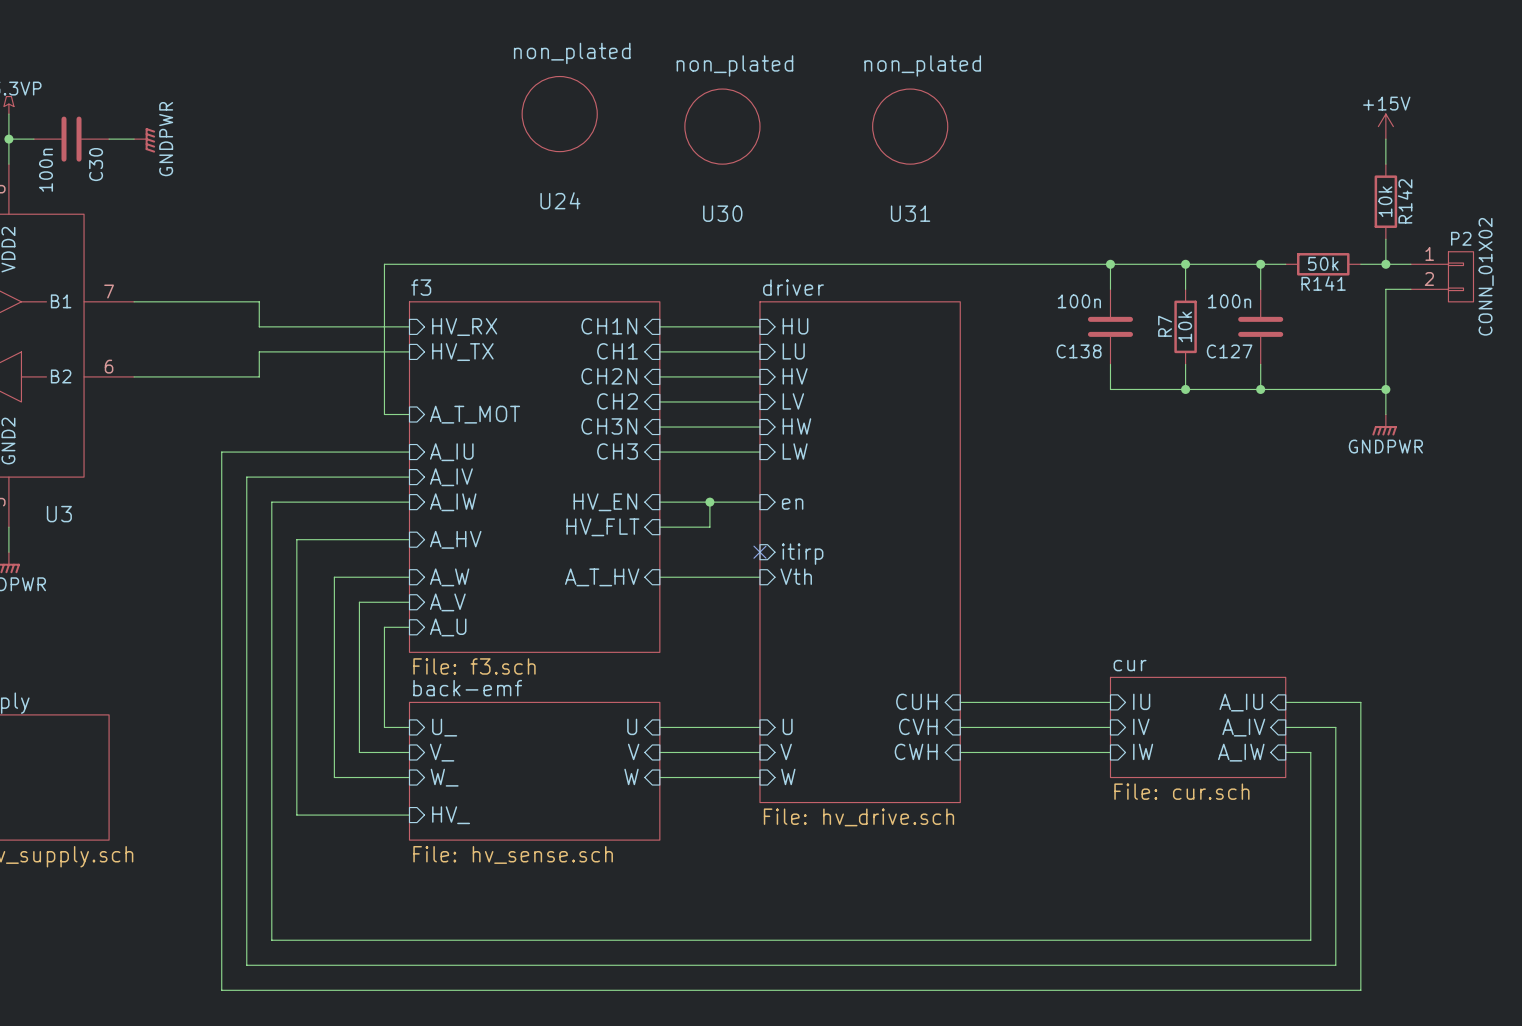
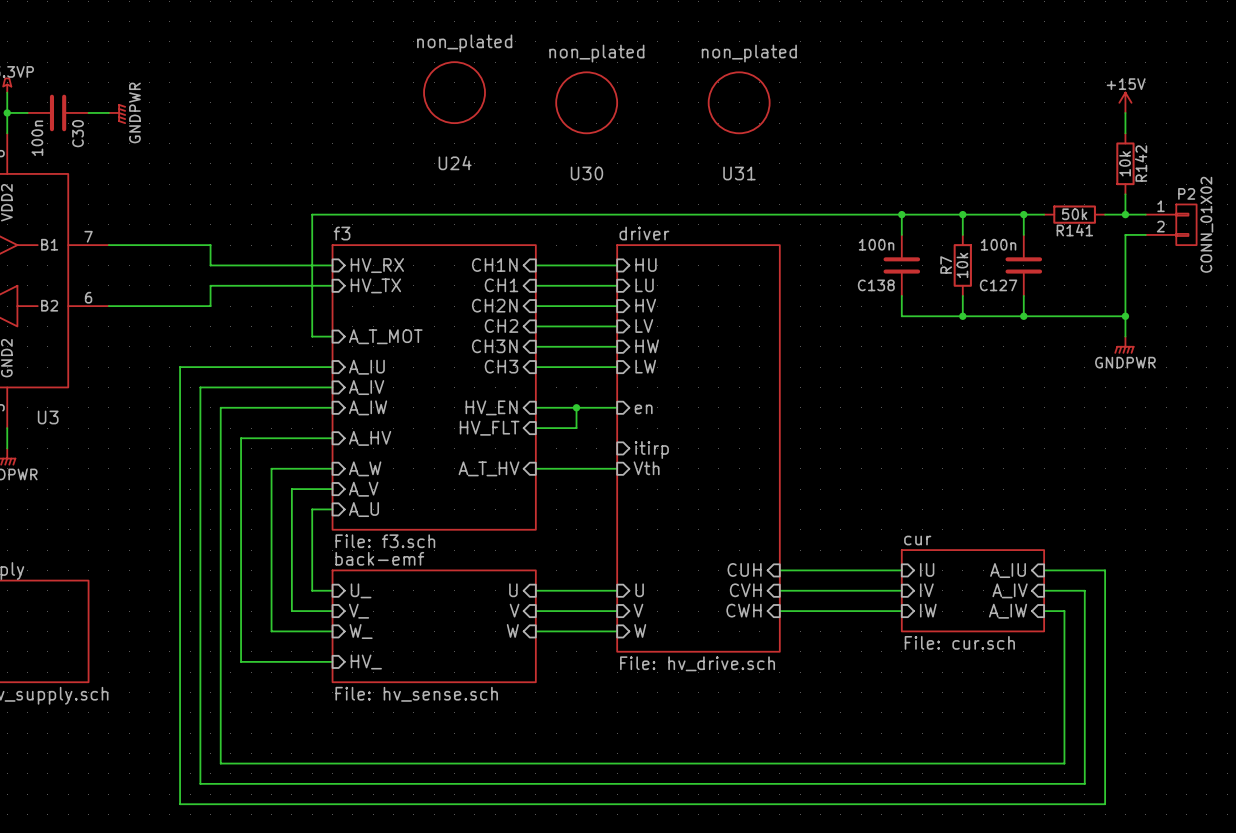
no-connect mark: (759, 552) -> none

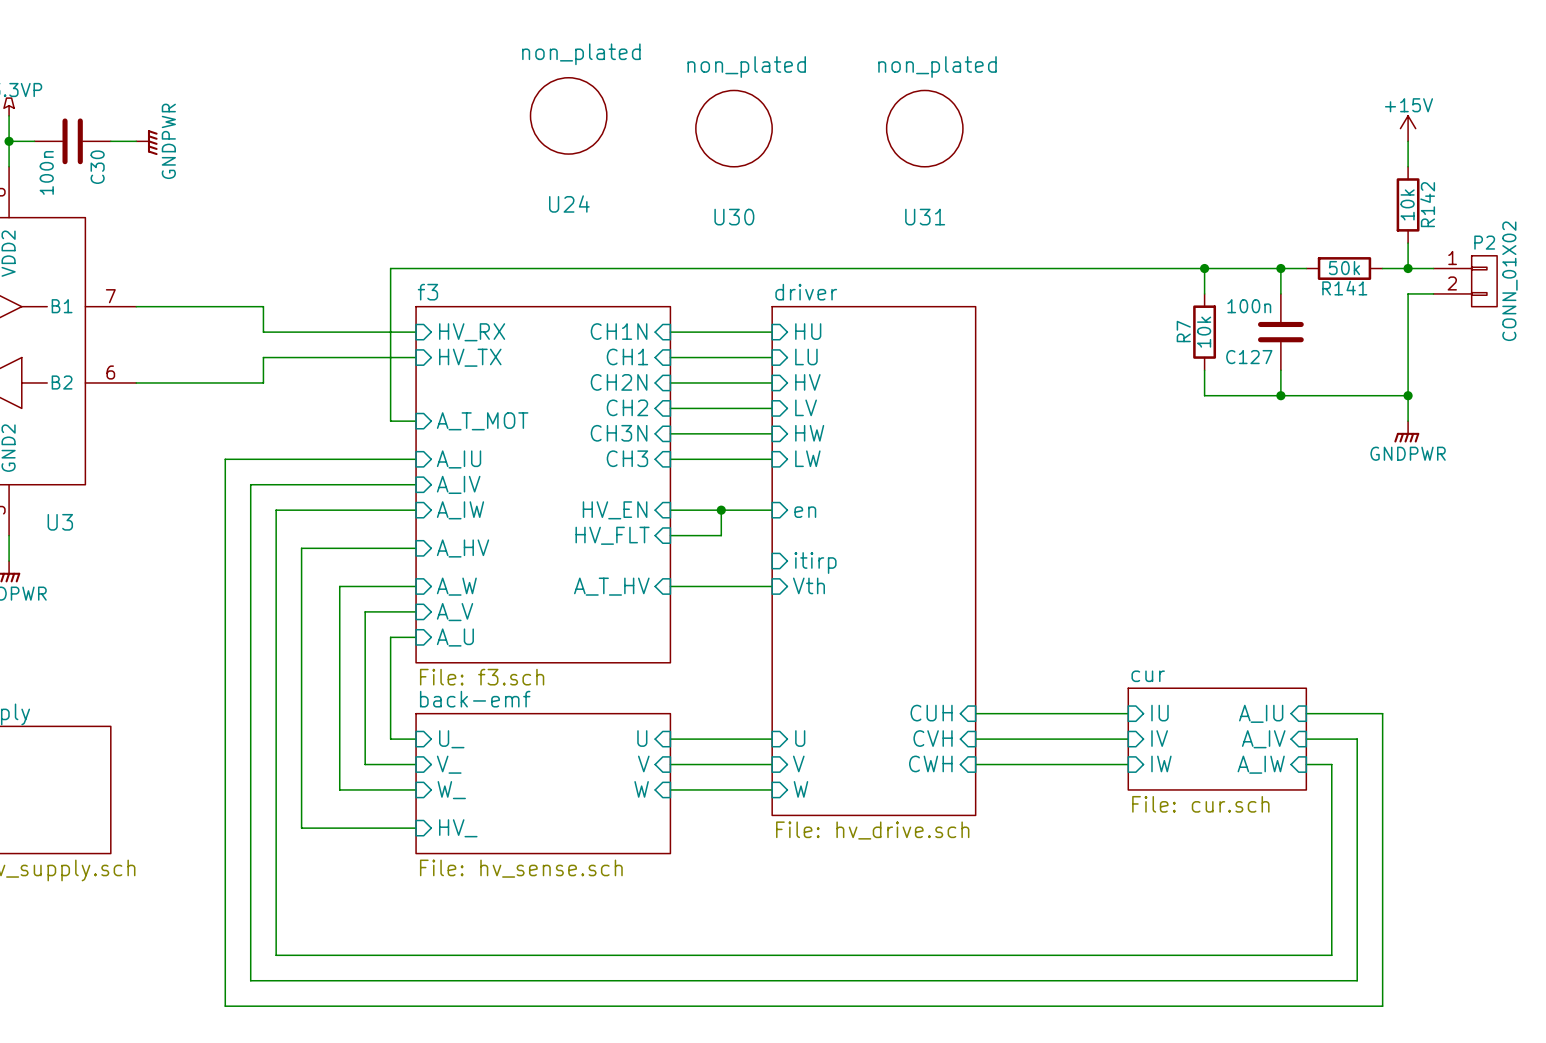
wire: (901, 214) (901, 234) -> none
junction: (901, 214) -> none
C138: 100n (901, 265) -> none
wire: (901, 295) (901, 316) (962, 316) -> none
junction: (962, 316) -> none

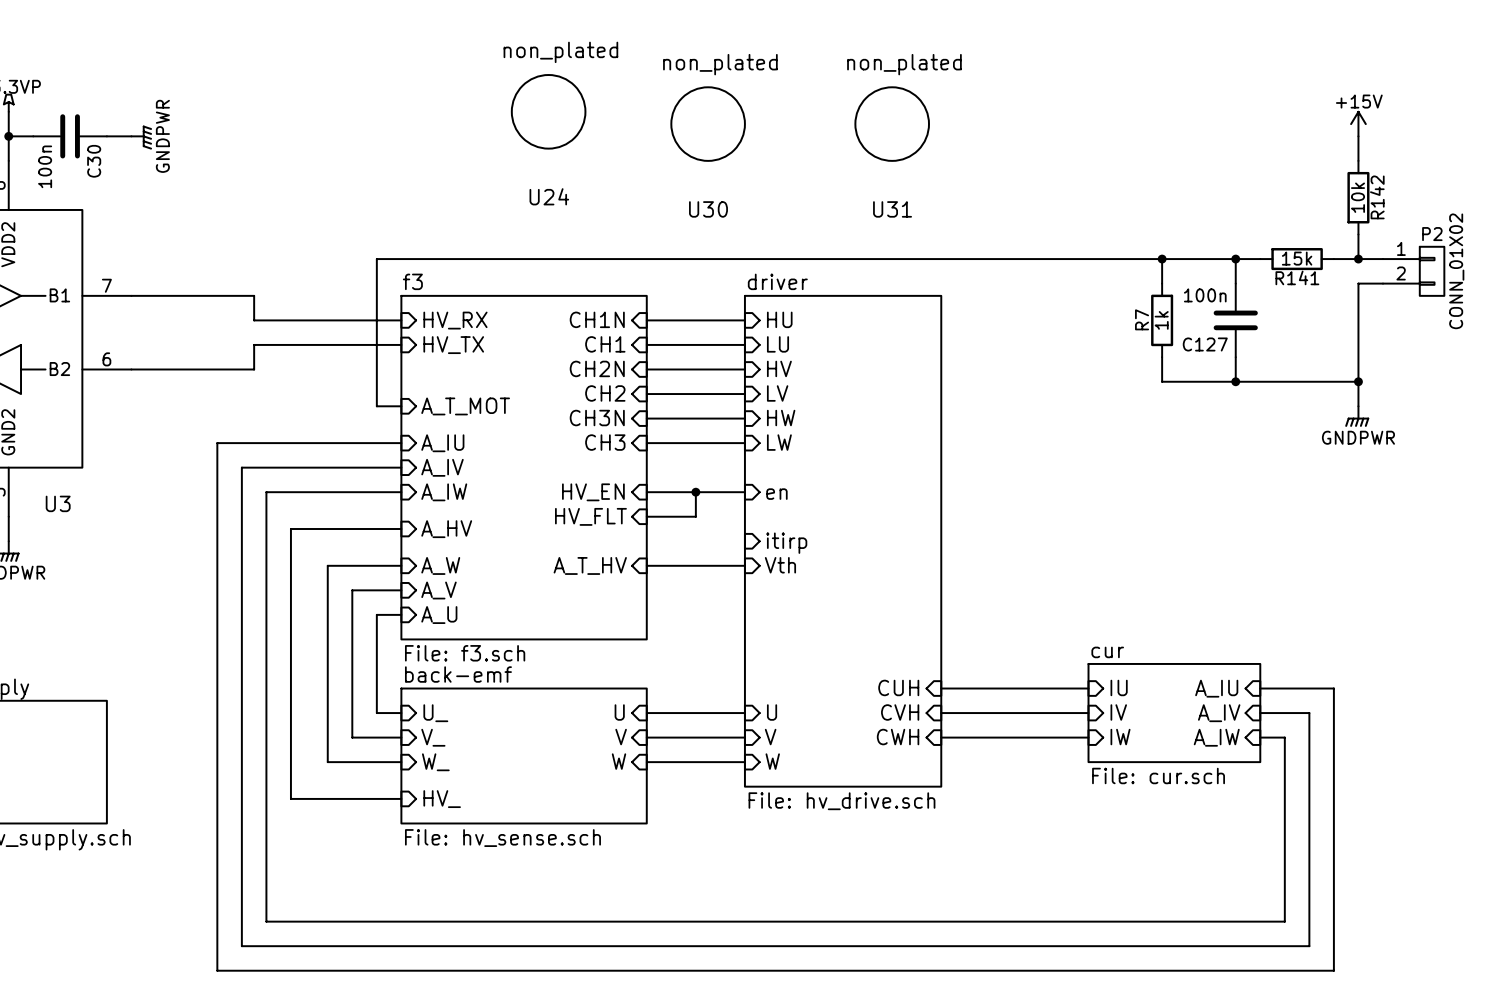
R141 value: 50k (1344, 268) -> 15k (1297, 258)
R7 value: 10k (1204, 332) -> 1k (1161, 320)

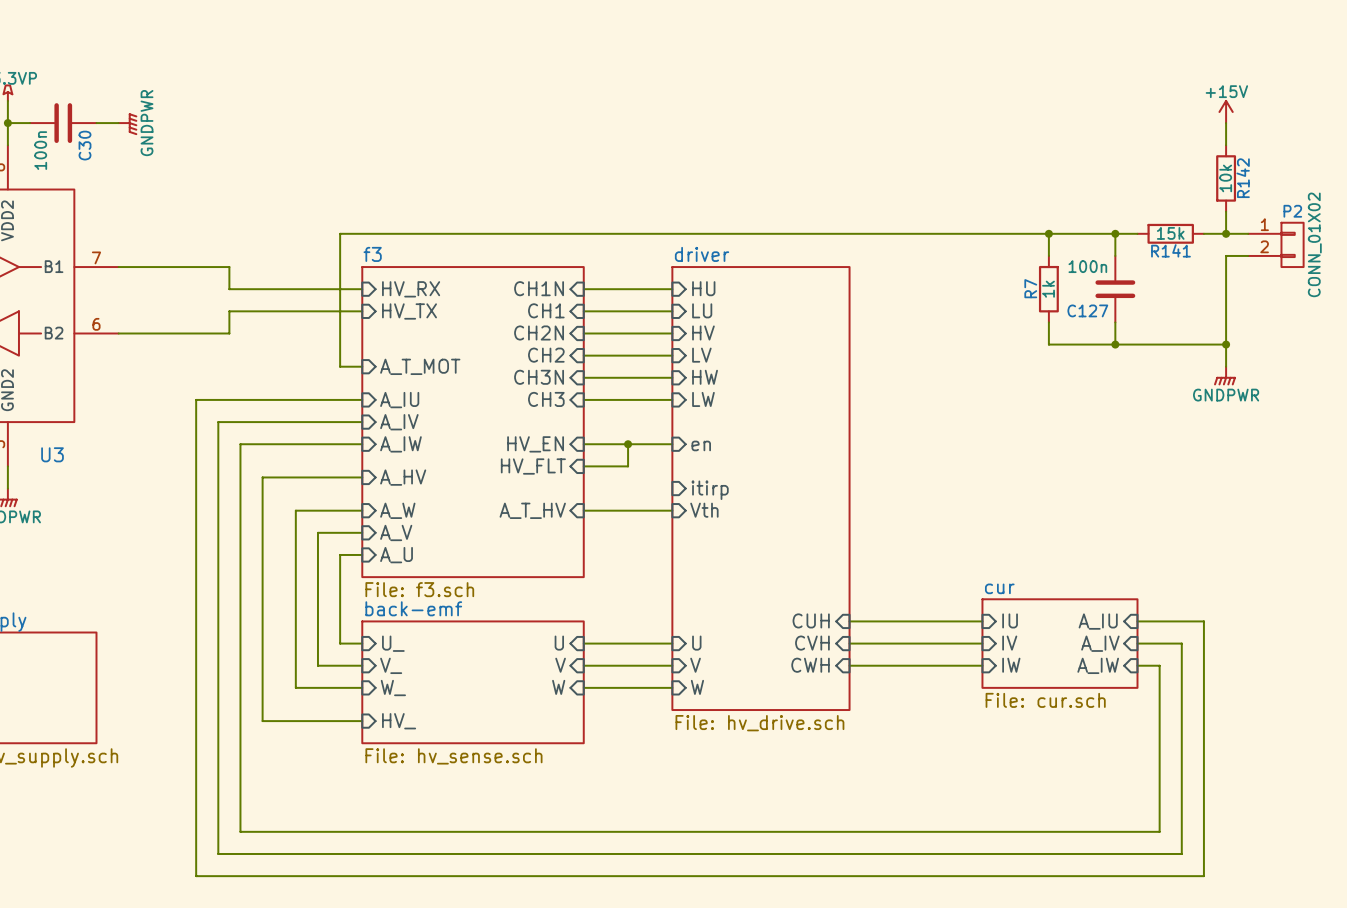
U24: non_plated (548, 111) -> none
U30: non_plated (708, 124) -> none
U31: non_plated (892, 124) -> none

